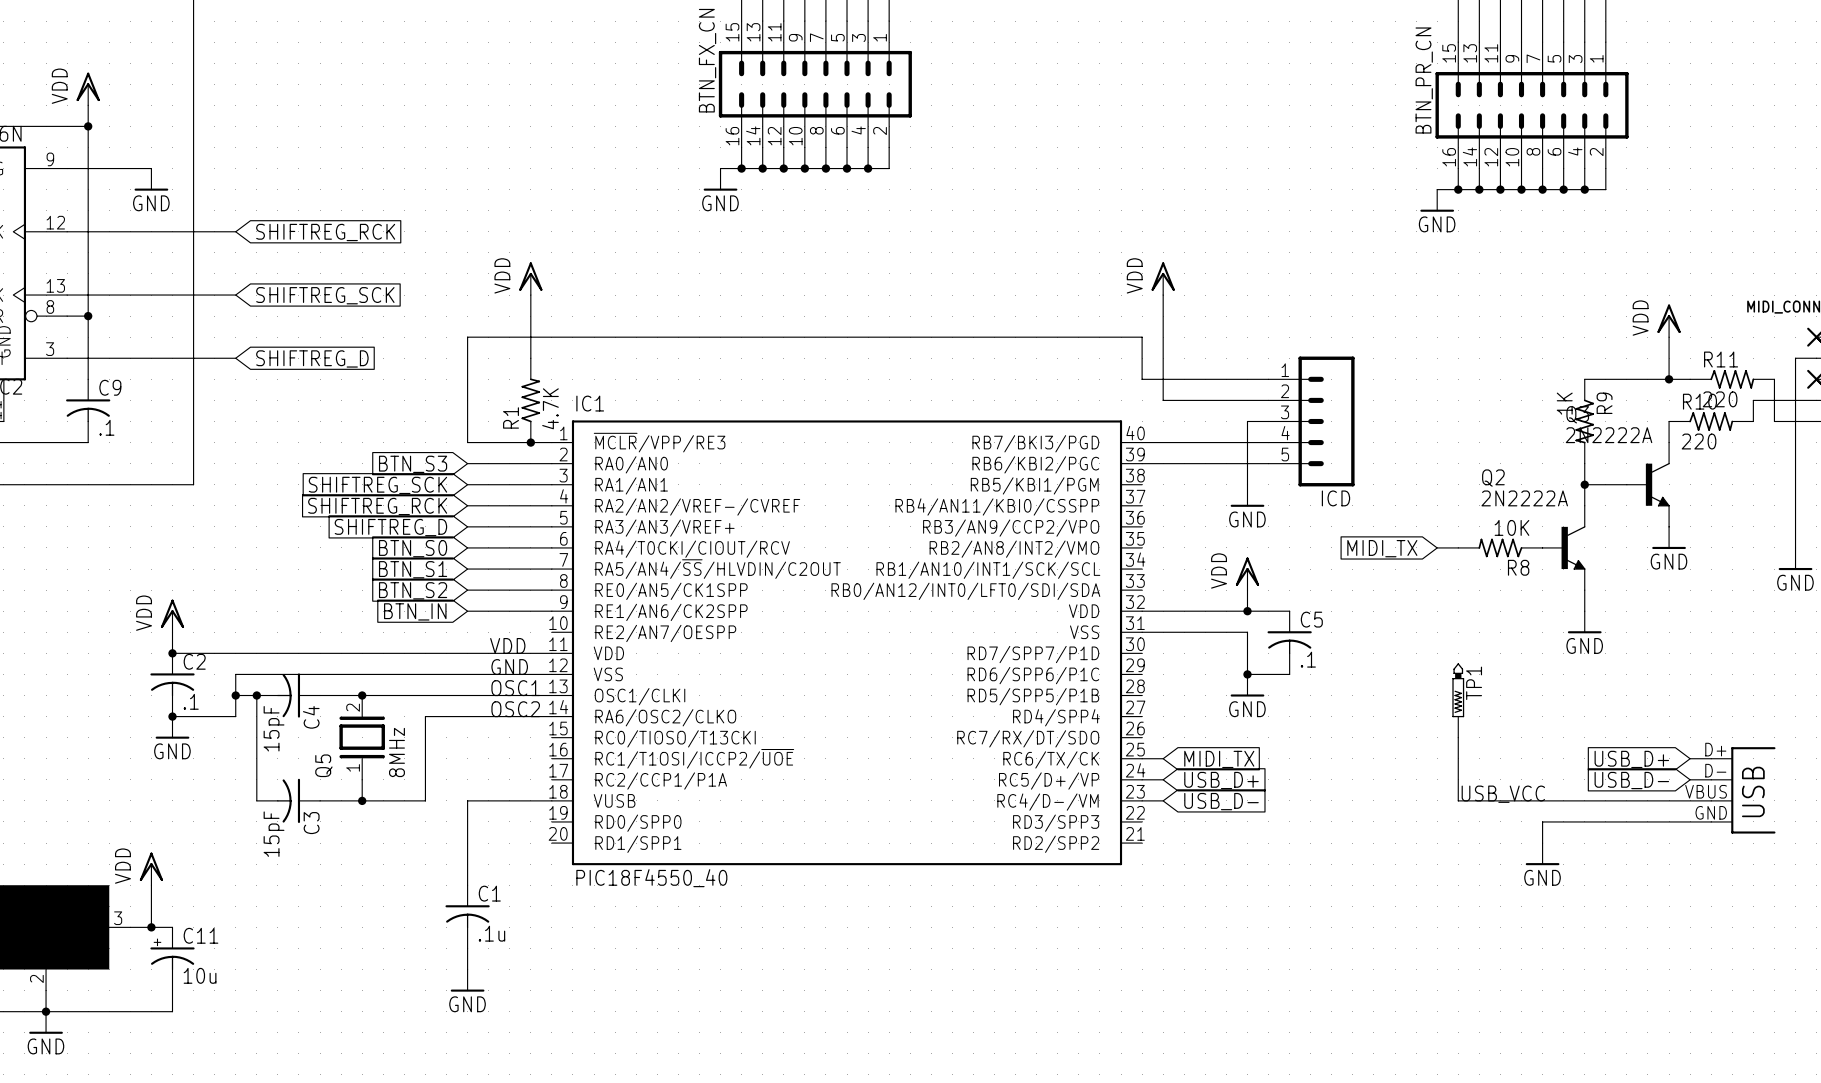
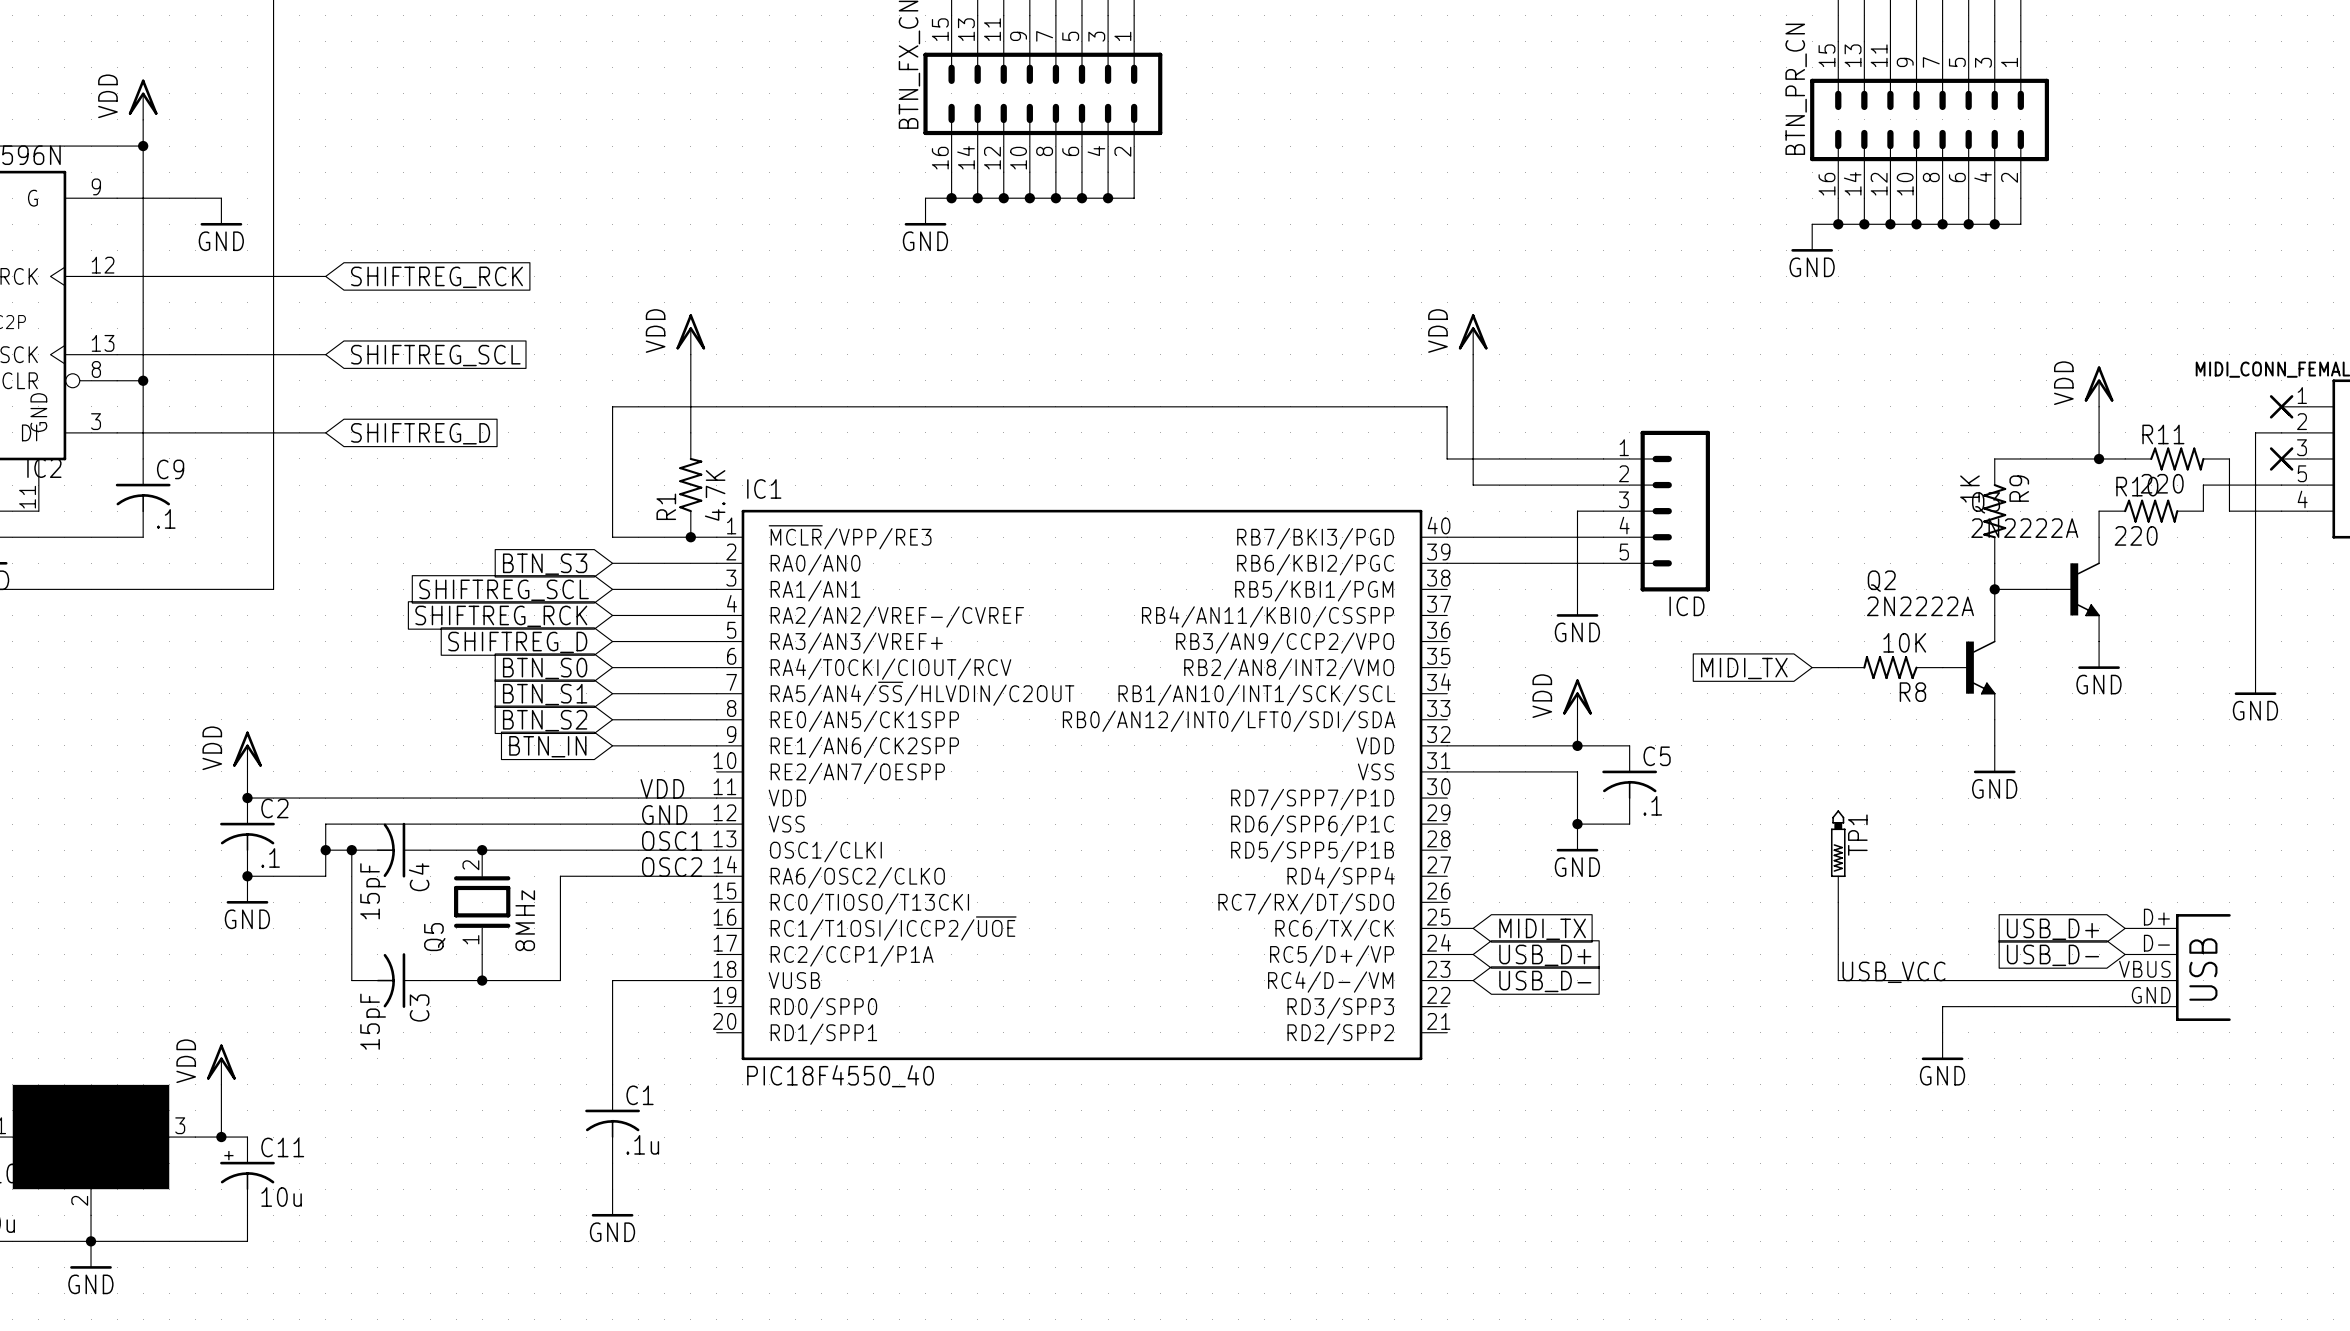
global label: SHIFTREG_SCK (325, 295) -> SHIFTREG_SCL (435, 355)
global label: SHIFTREG_SCK (377, 485) -> SHIFTREG_SCL (504, 590)

